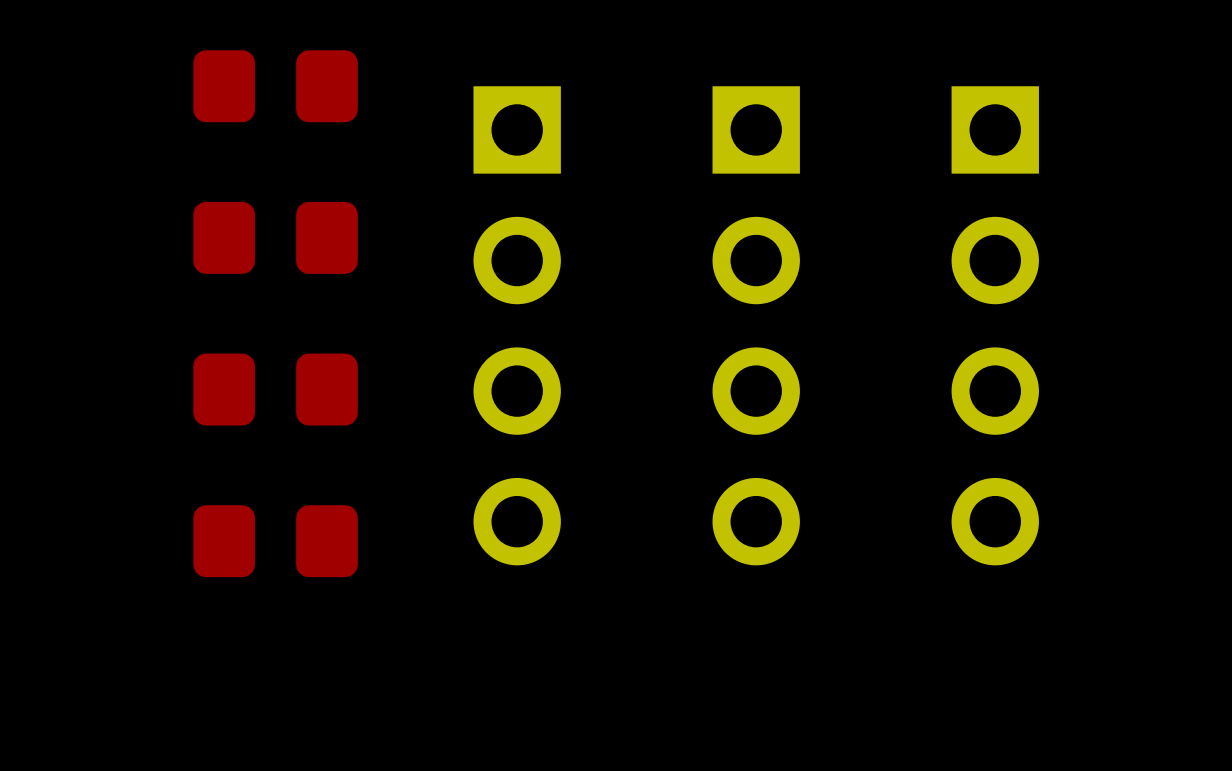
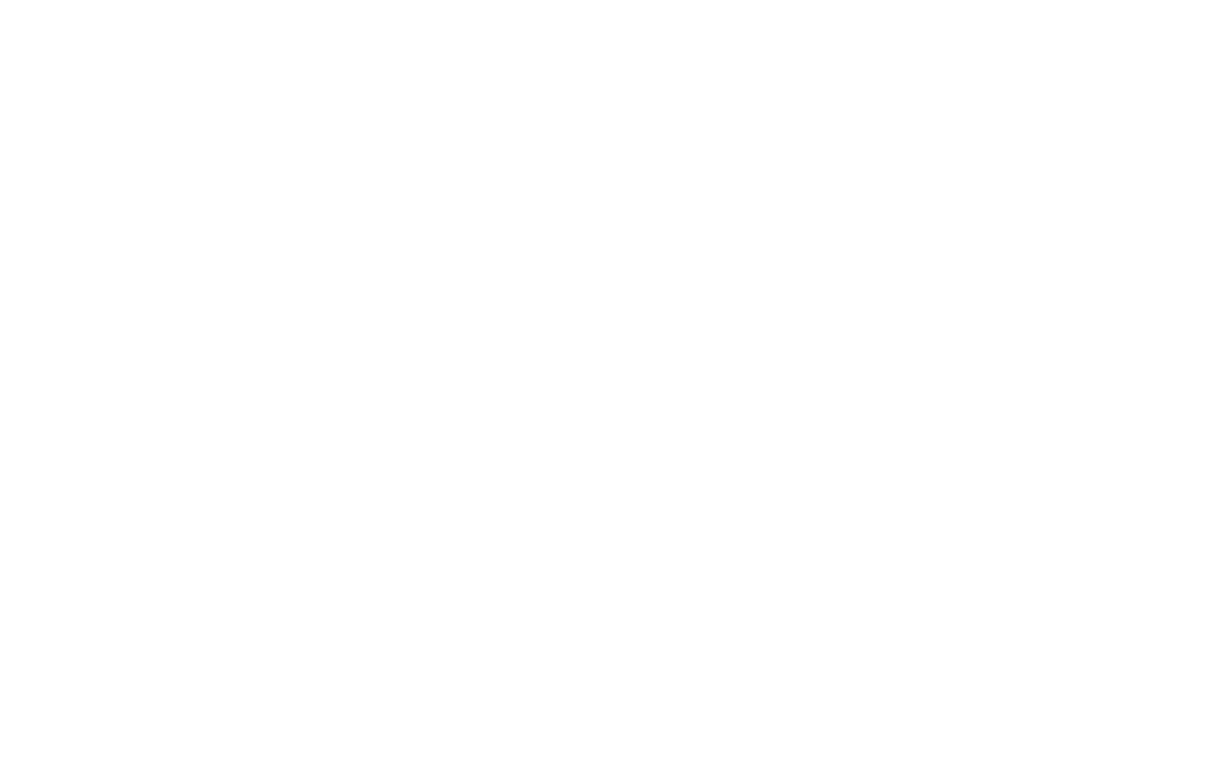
part: (275, 86) -> none
part: (275, 237) -> none
part: (517, 325) -> none
part: (756, 325) -> none
part: (995, 325) -> none
part: (275, 389) -> none
part: (275, 541) -> none

